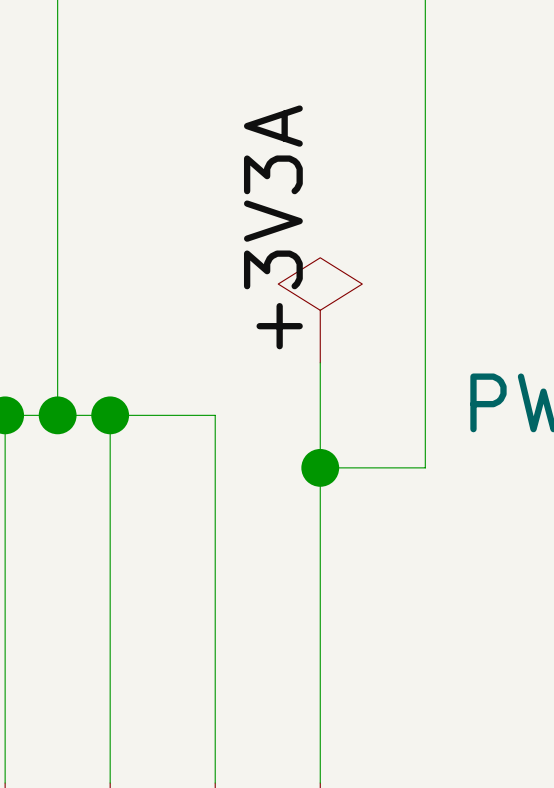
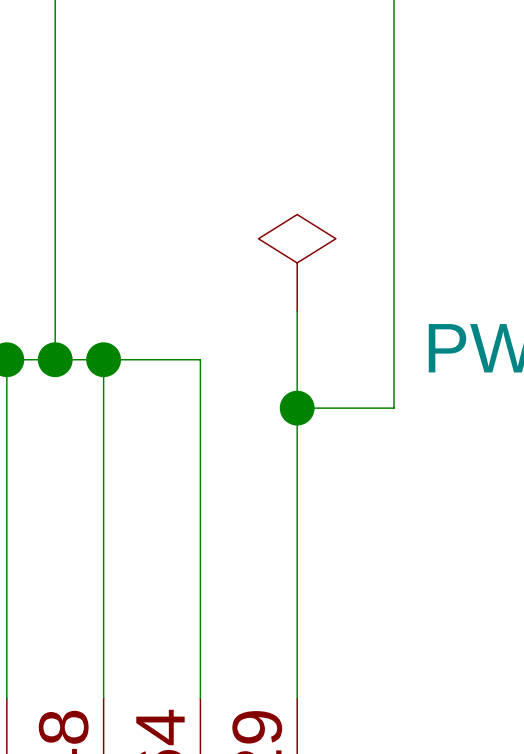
label: +3V3A (273, 227) -> none

